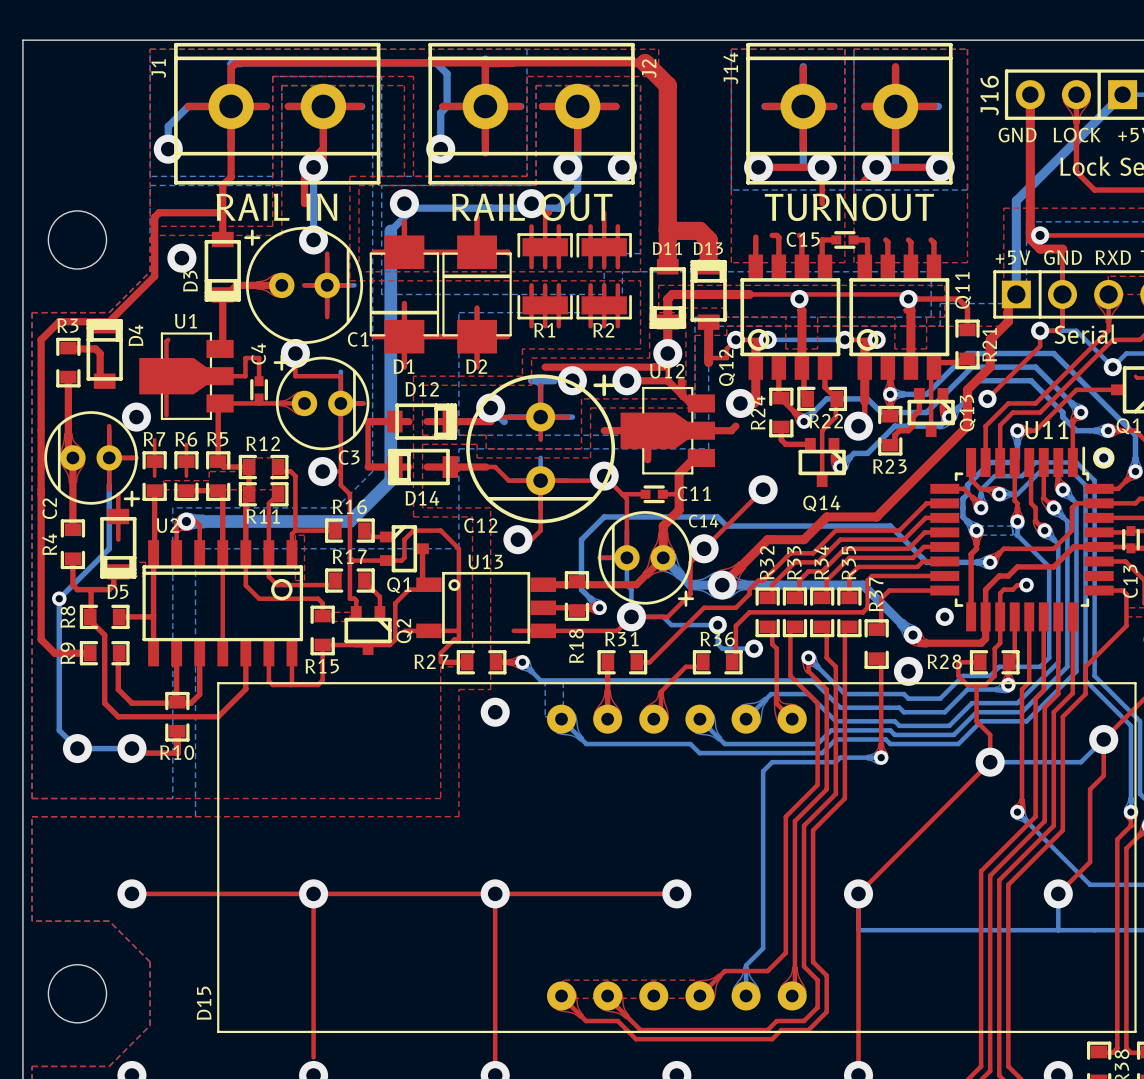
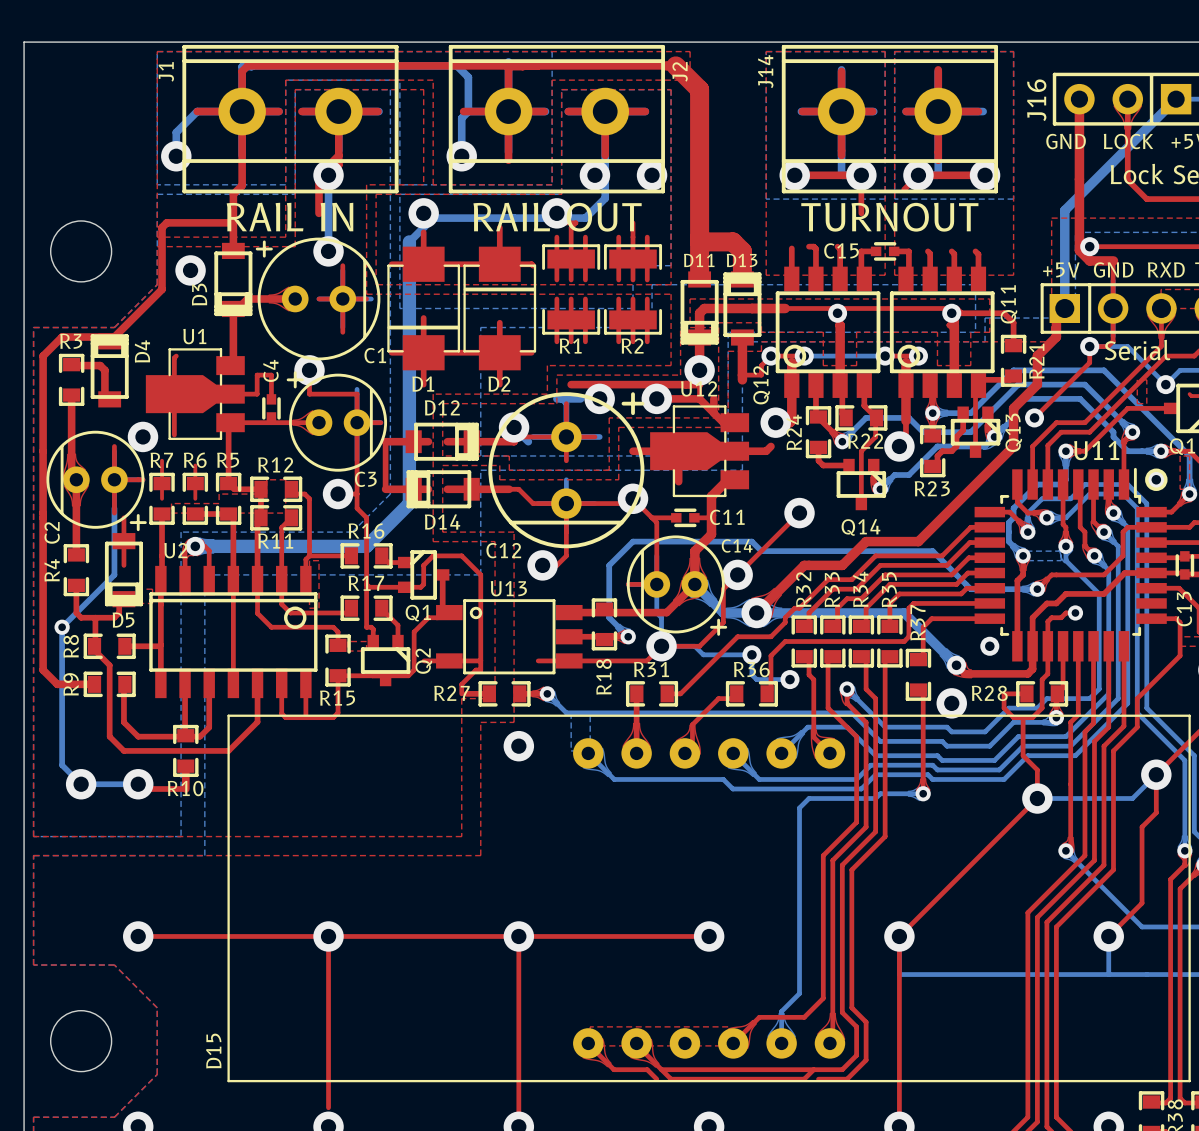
top zone outline: none -> (1137, 379) (1137, 403) (1146, 403) (1146, 379) (1137, 379)
top zone outline: none -> (1180, 455) (1180, 489) (1189, 489) (1189, 455) (1180, 455)
top track: none -> (661, 1069) (813, 1069)
top track: (626, 1030) (635, 1039) (772, 1039) (781, 1030) -> none

